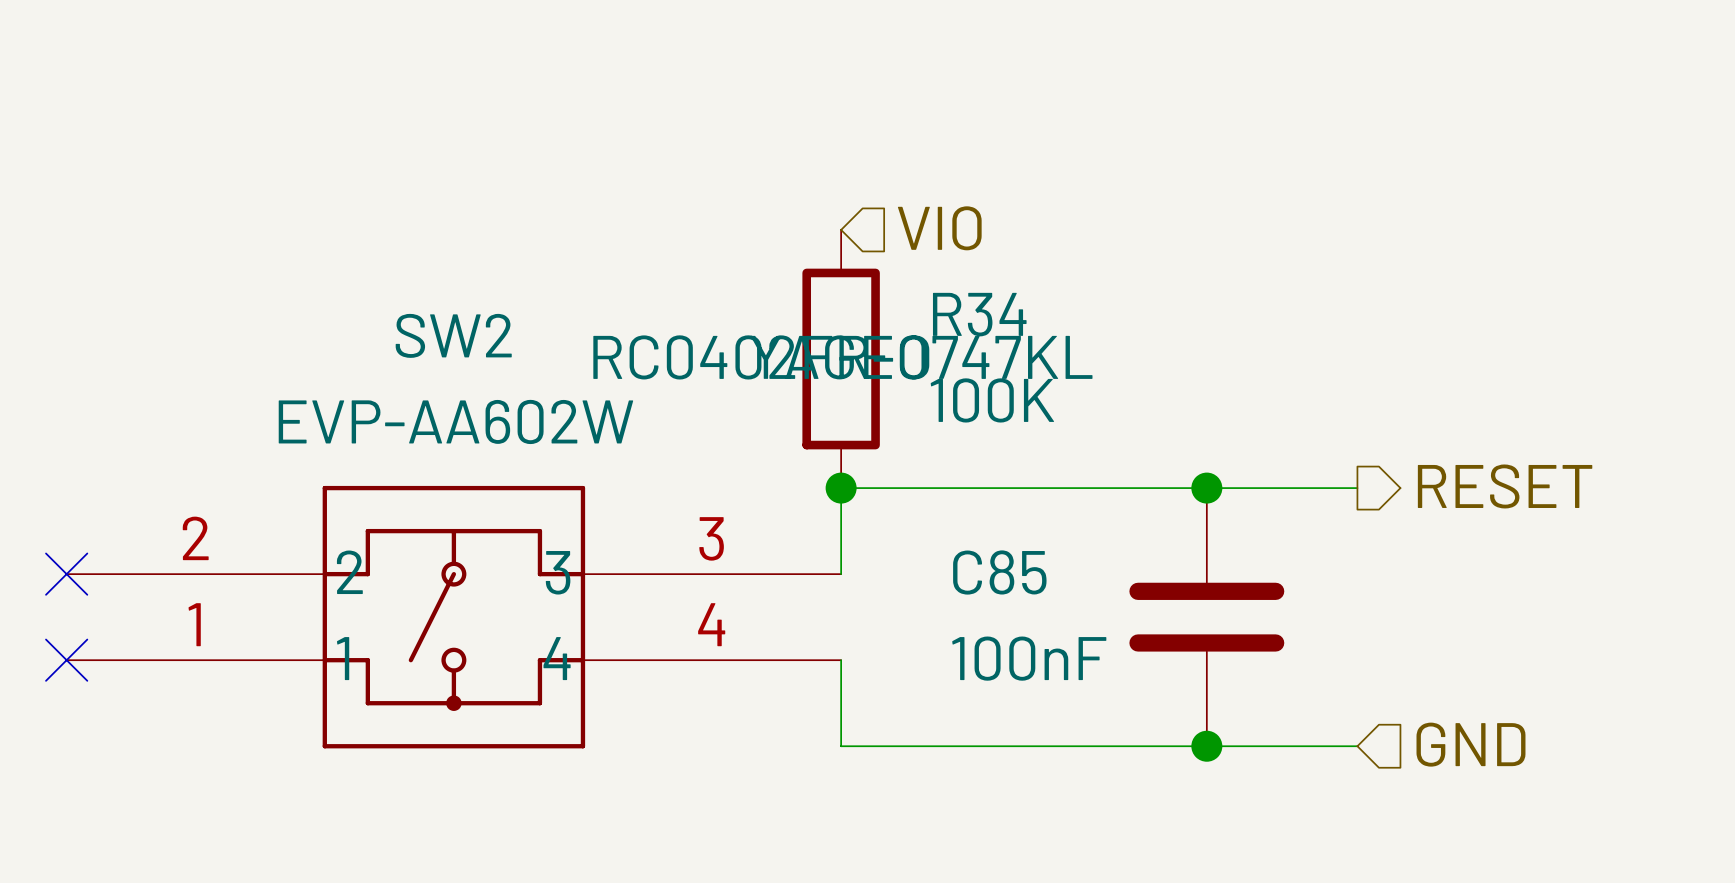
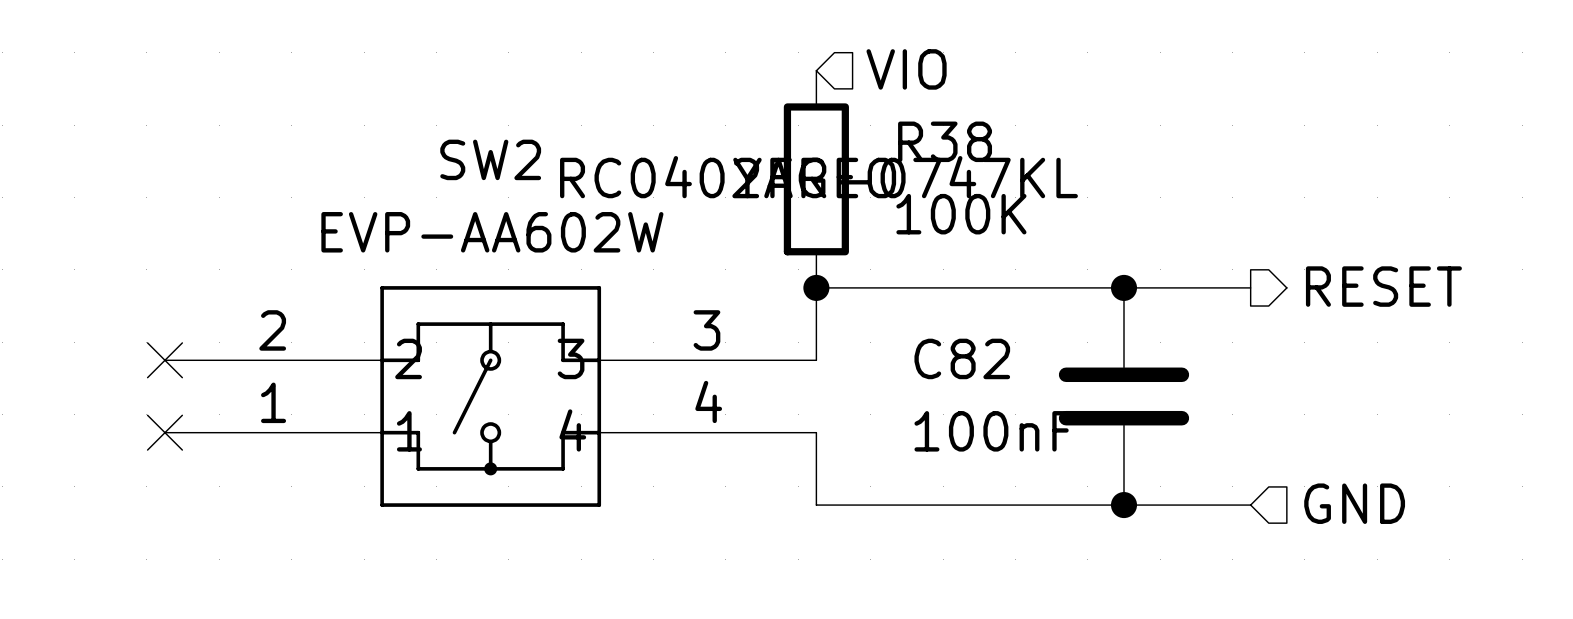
R34 name: R34 (979, 314) -> R38 (945, 141)
C85 name: C85 (999, 572) -> C82 (962, 358)

